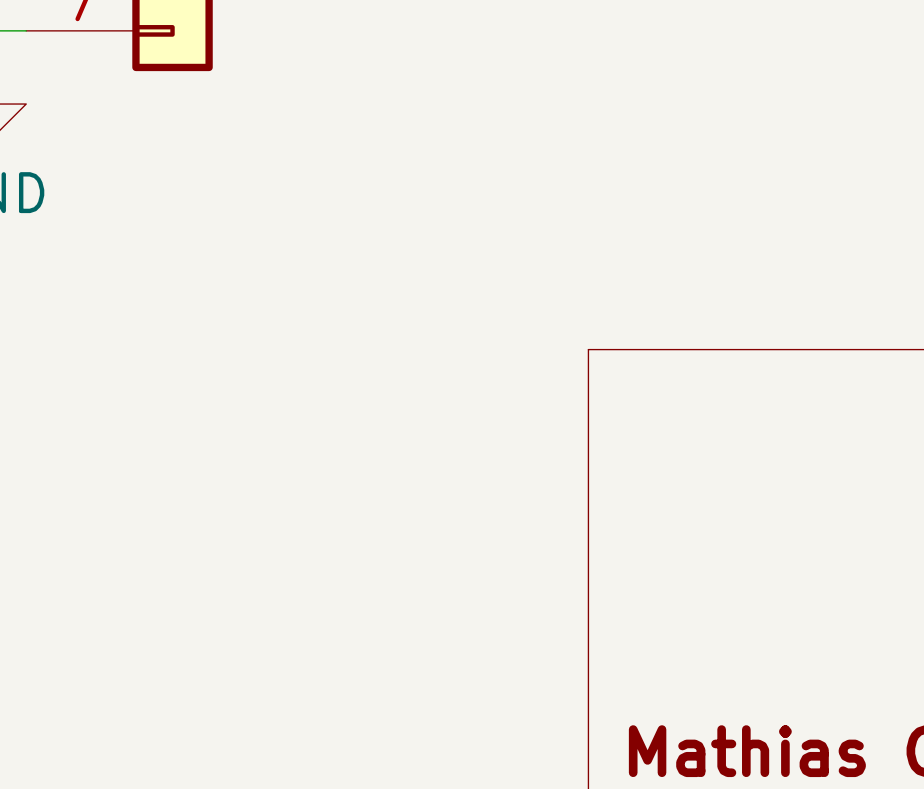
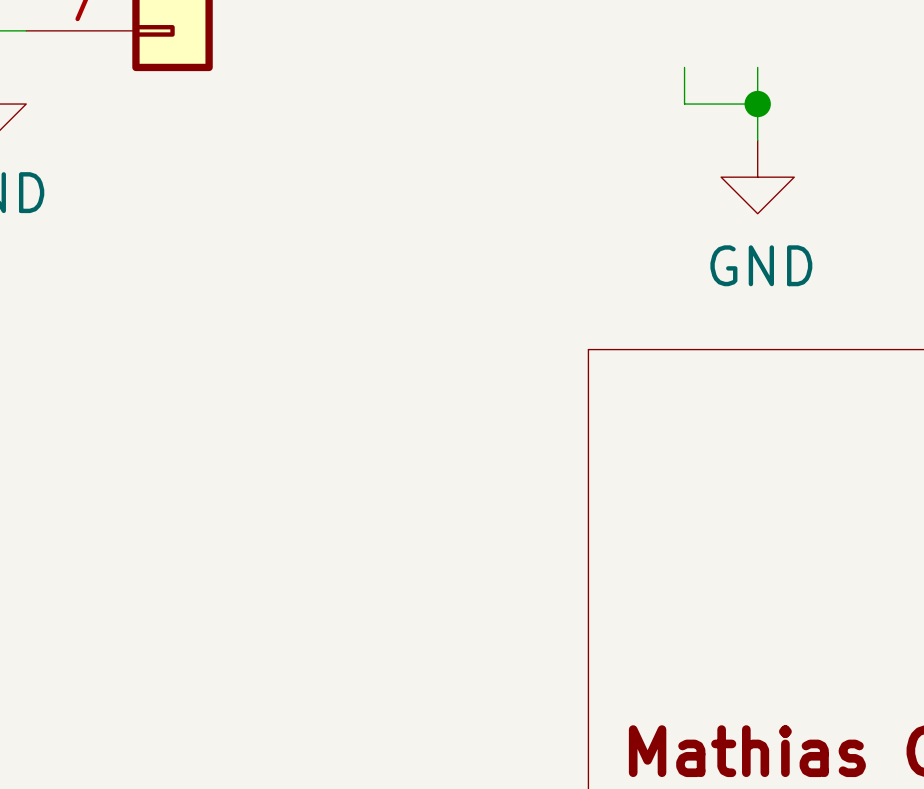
wire: none -> (684, 67) (684, 104) (757, 104)
wire: none -> (757, 67) (757, 140)
junction: none -> (757, 104)
power symbol: none -> GND (757, 177)

